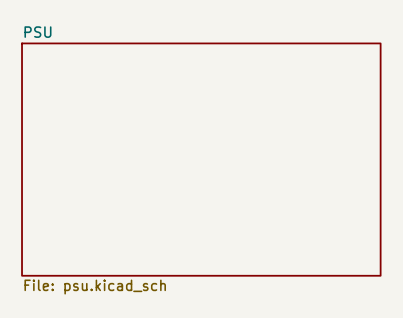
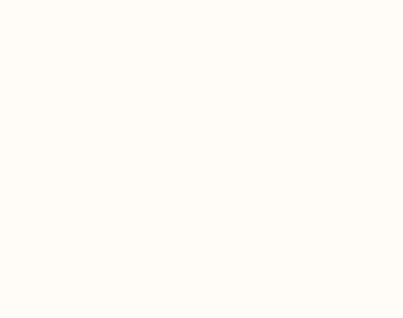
sheet PSU: File: psu.kicad_sch (201, 159) -> none

